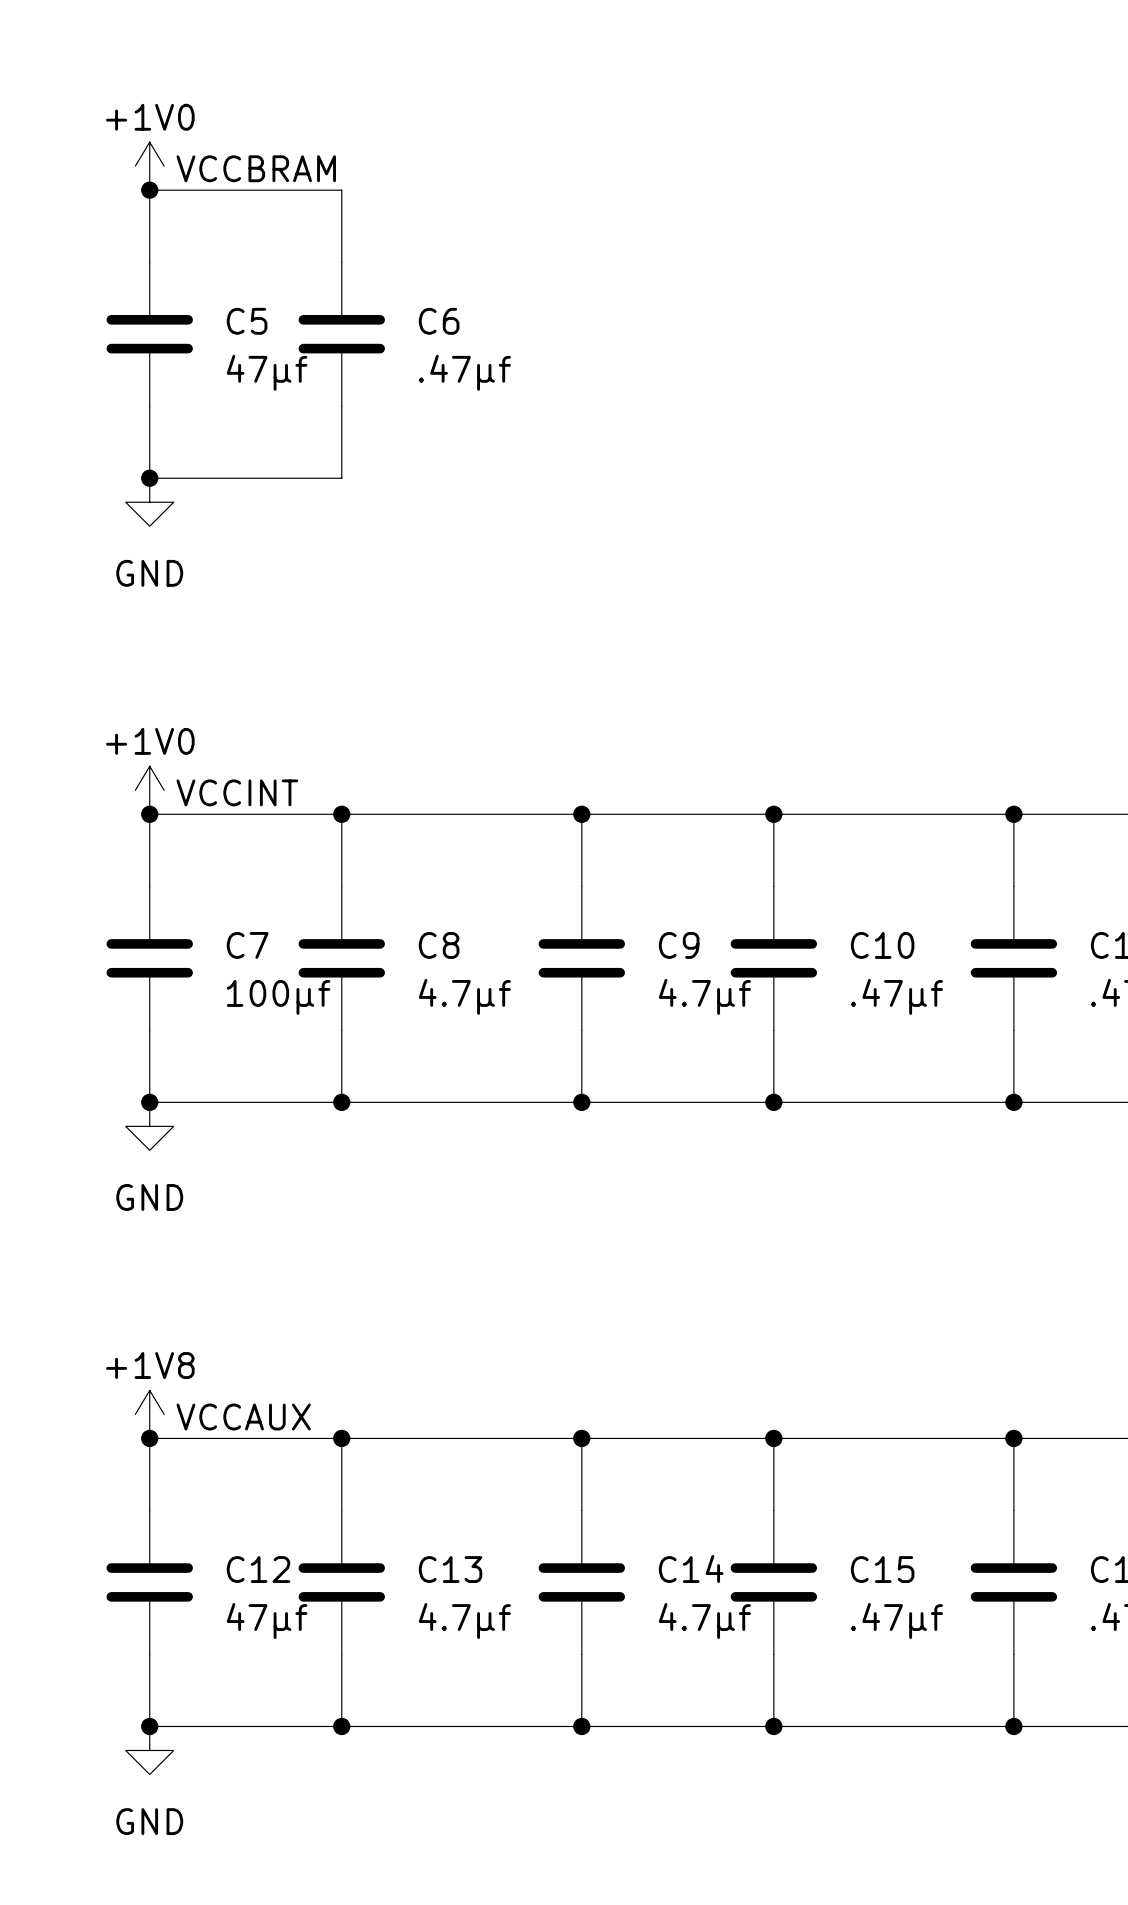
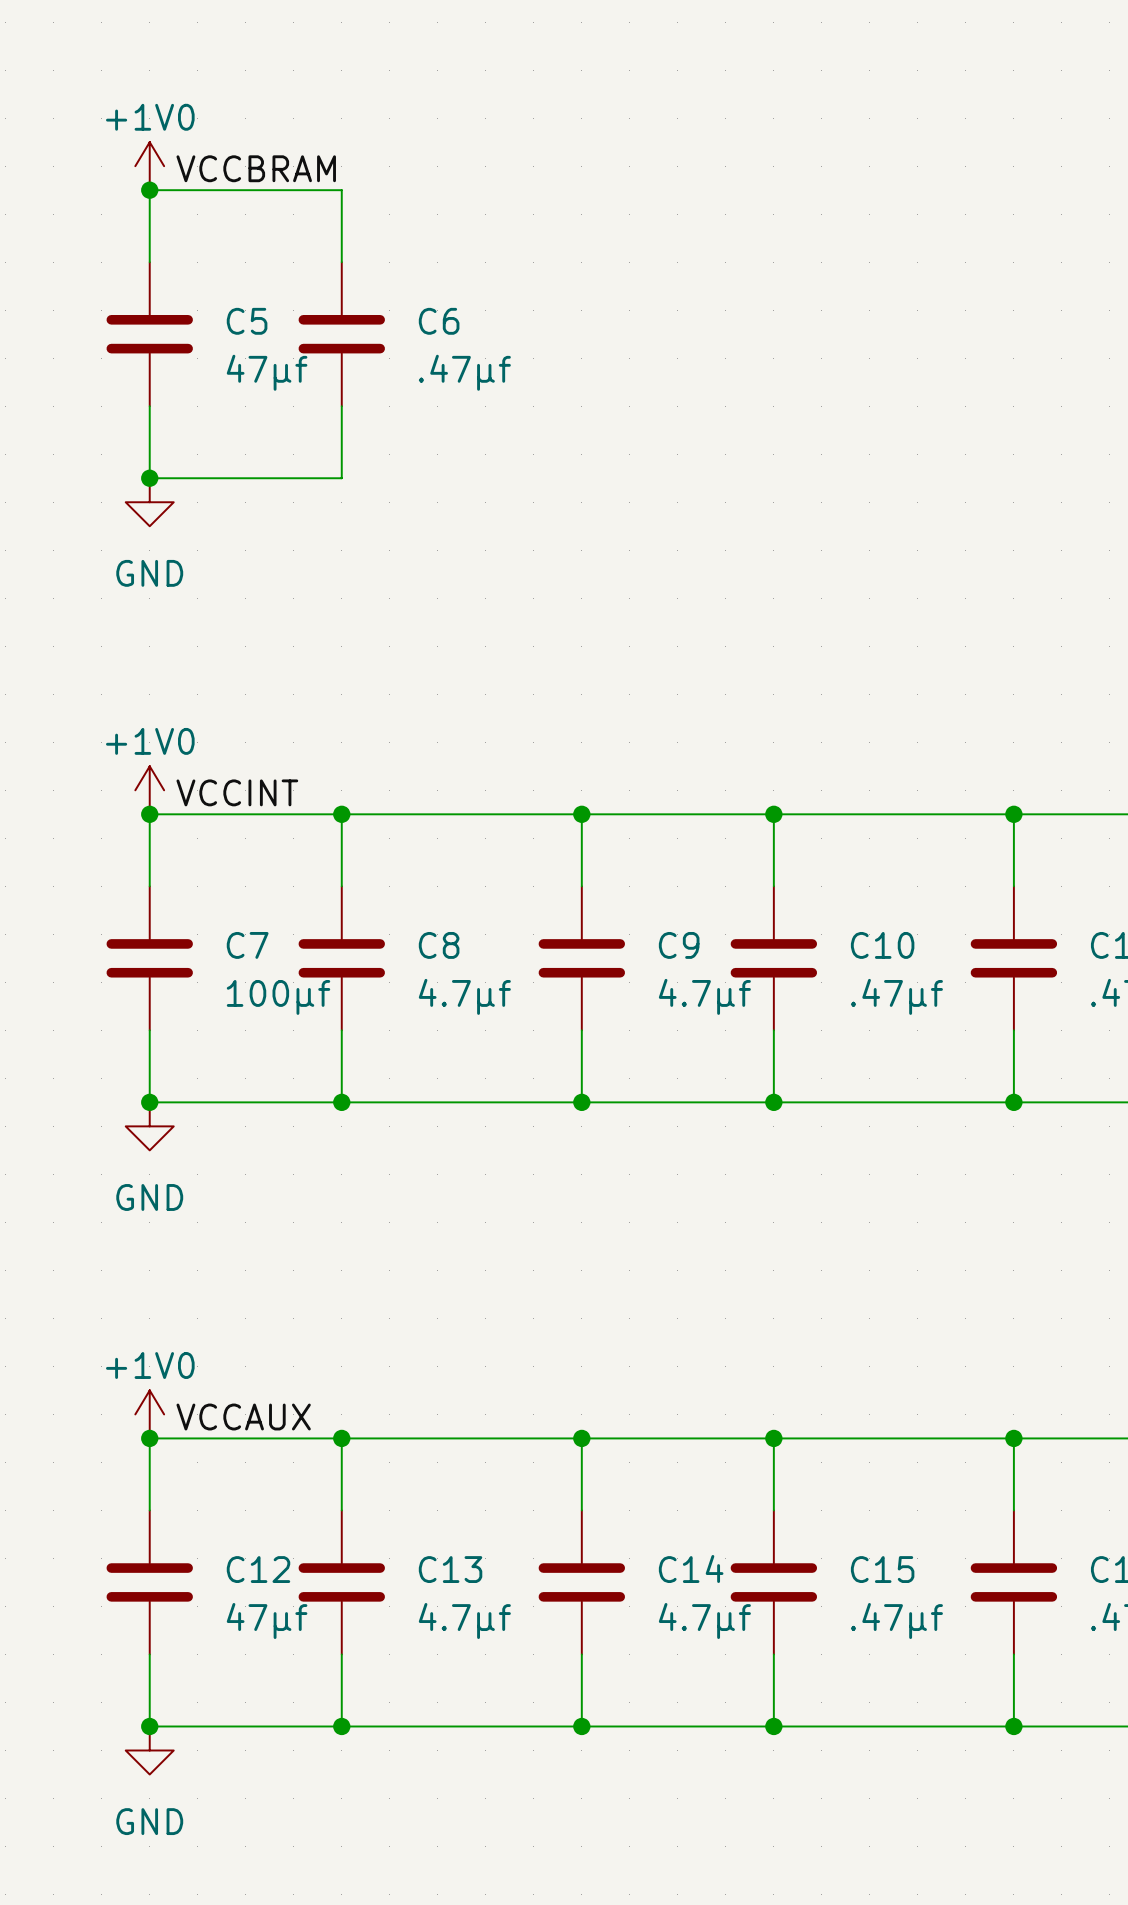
power symbol: +1V8 (149, 1414) -> +1V0 (149, 1414)

